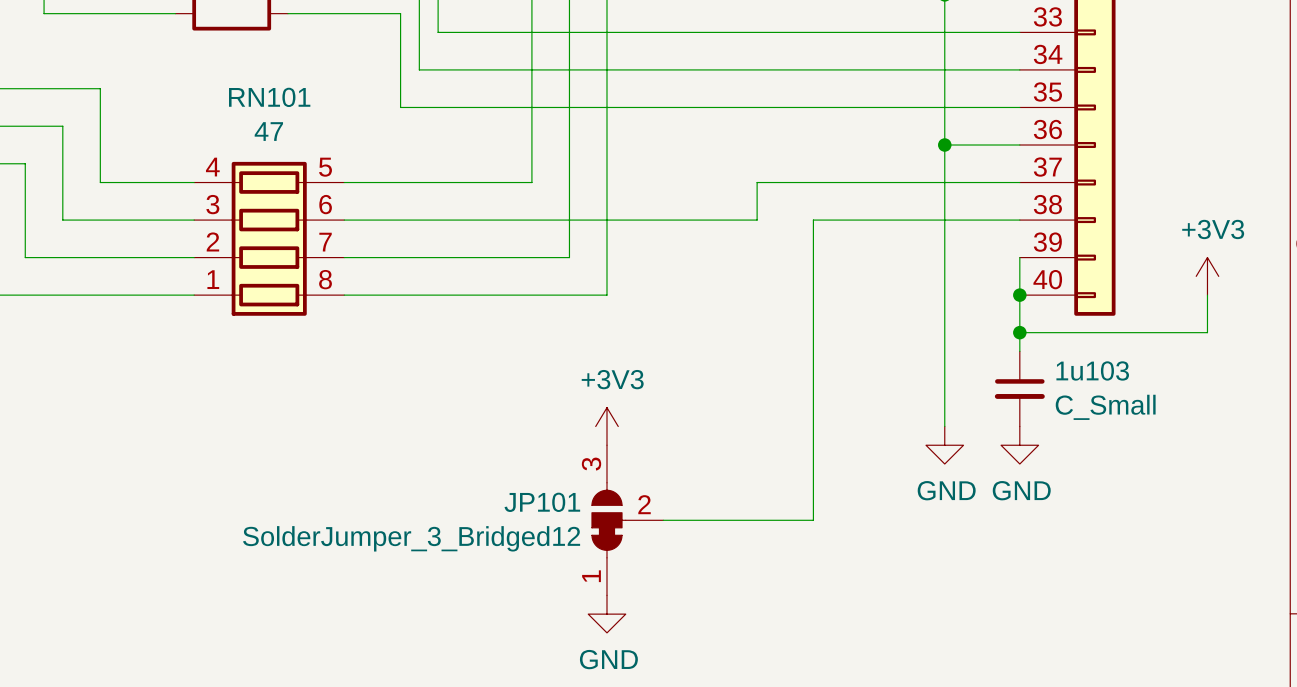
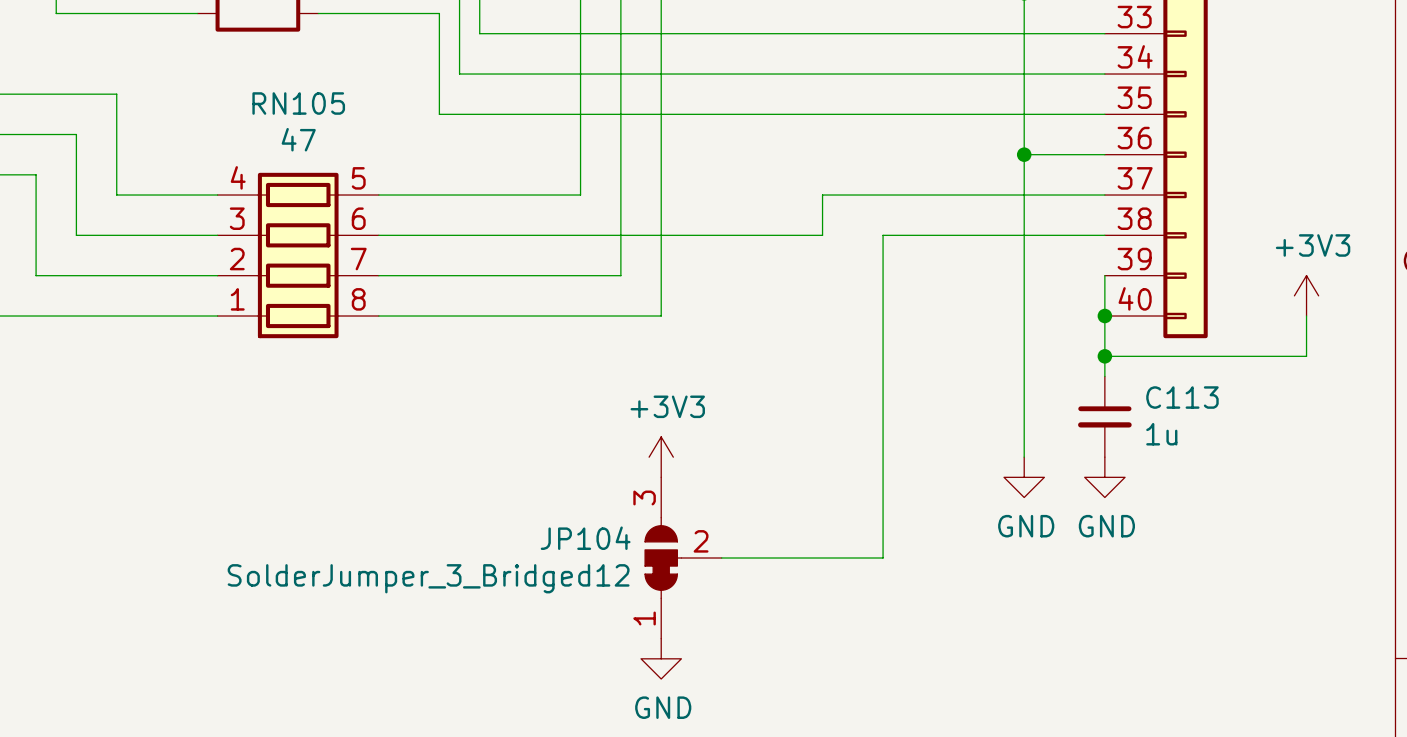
RN101 name: RN101 (269, 97) -> RN105 (298, 103)
1u103 name: 1u103 (1092, 370) -> C113 (1182, 397)
1u103 value: C_Small (1105, 407) -> 1u (1161, 434)
JP101 name: JP101 (542, 502) -> JP104 (585, 538)

